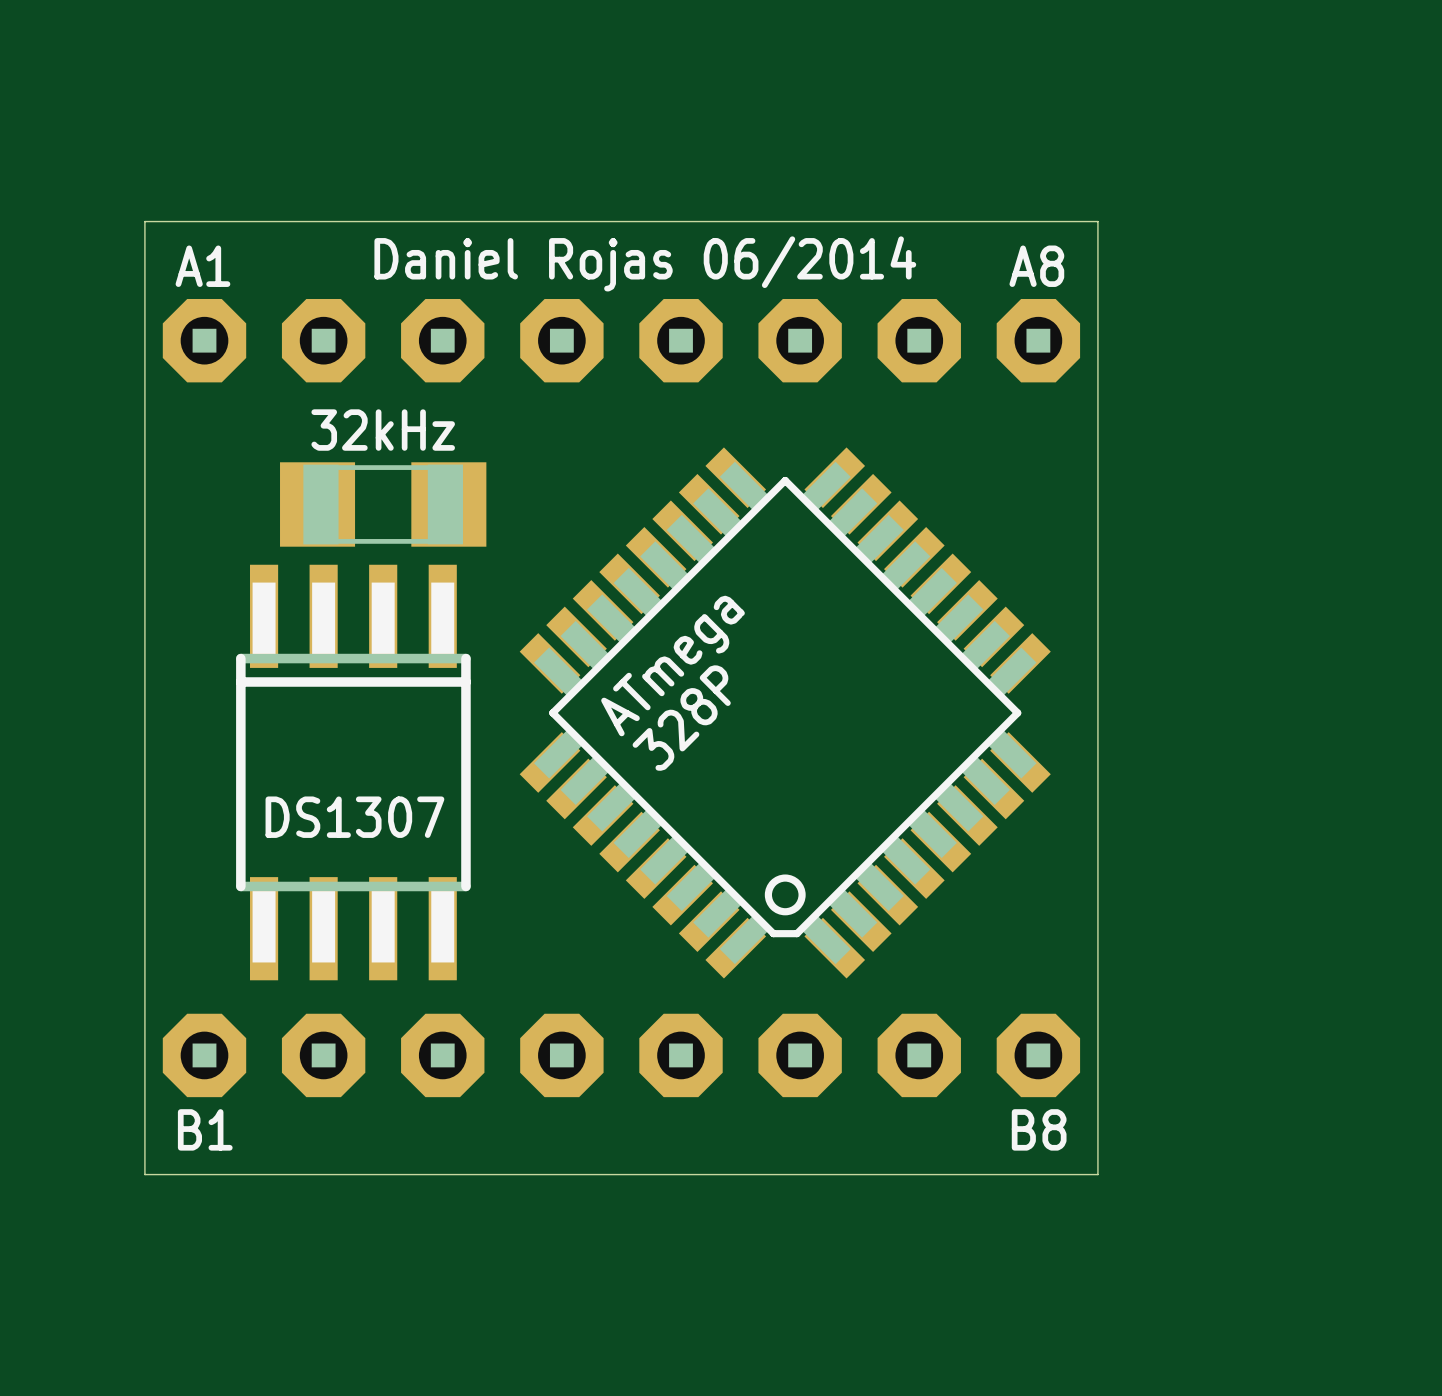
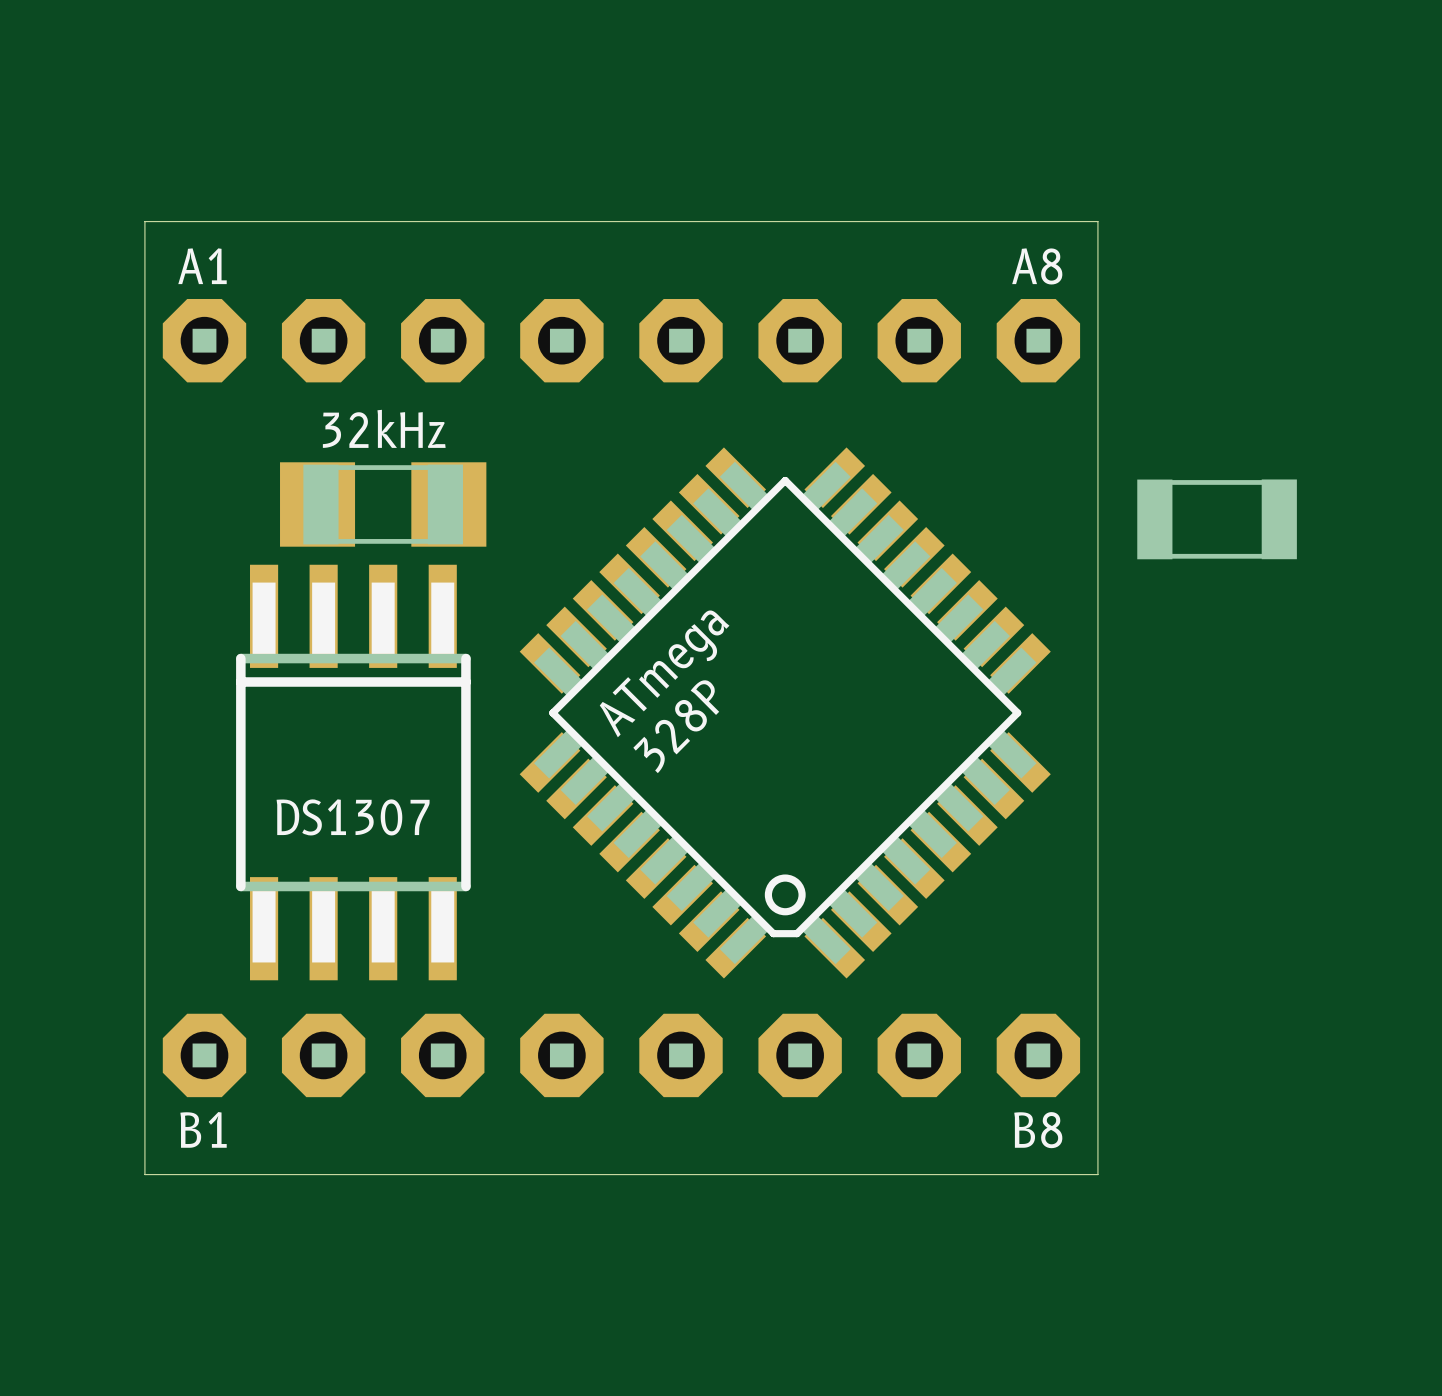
text: Daniel Rojas 06/2014 (645, 263) -> none
drawing: none -> [1137, 479, 1173, 560]
drawing: none -> [1261, 479, 1297, 560]
line: none -> (1171, 482) (1262, 482)
line: none -> (1171, 556) (1262, 556)

